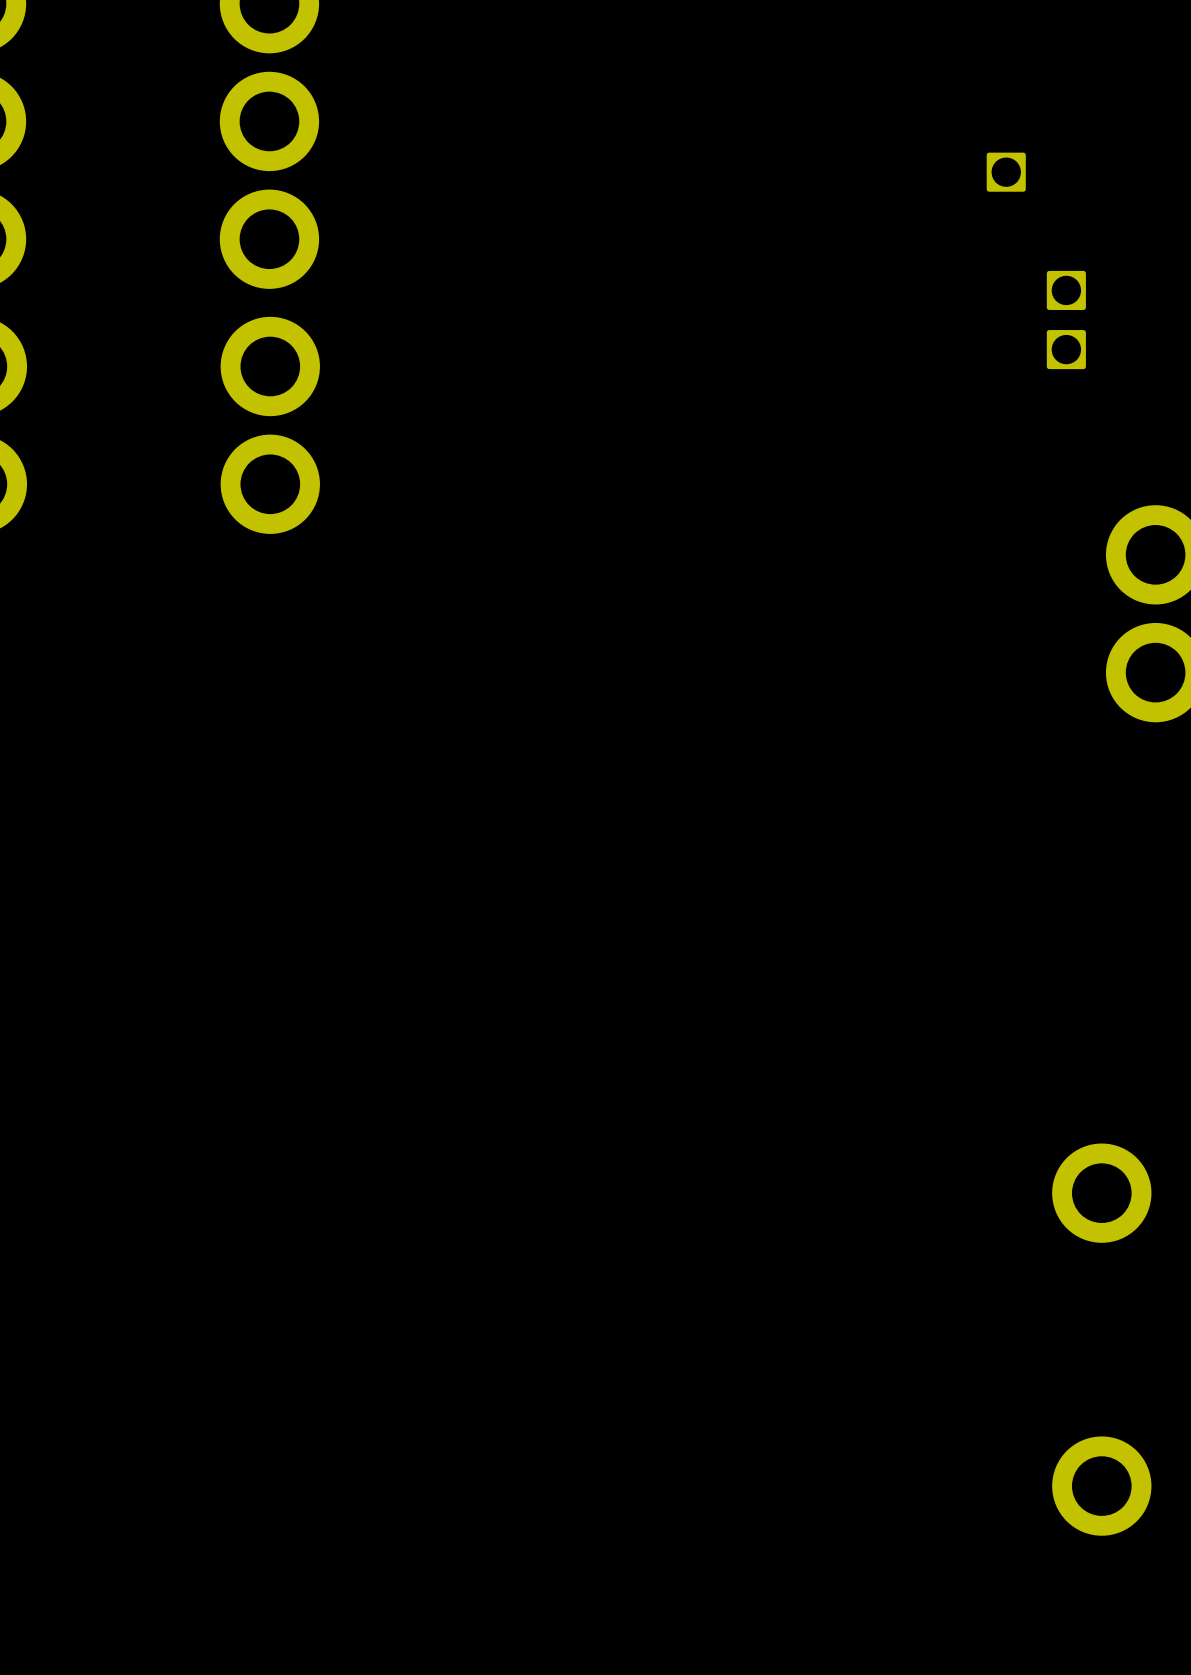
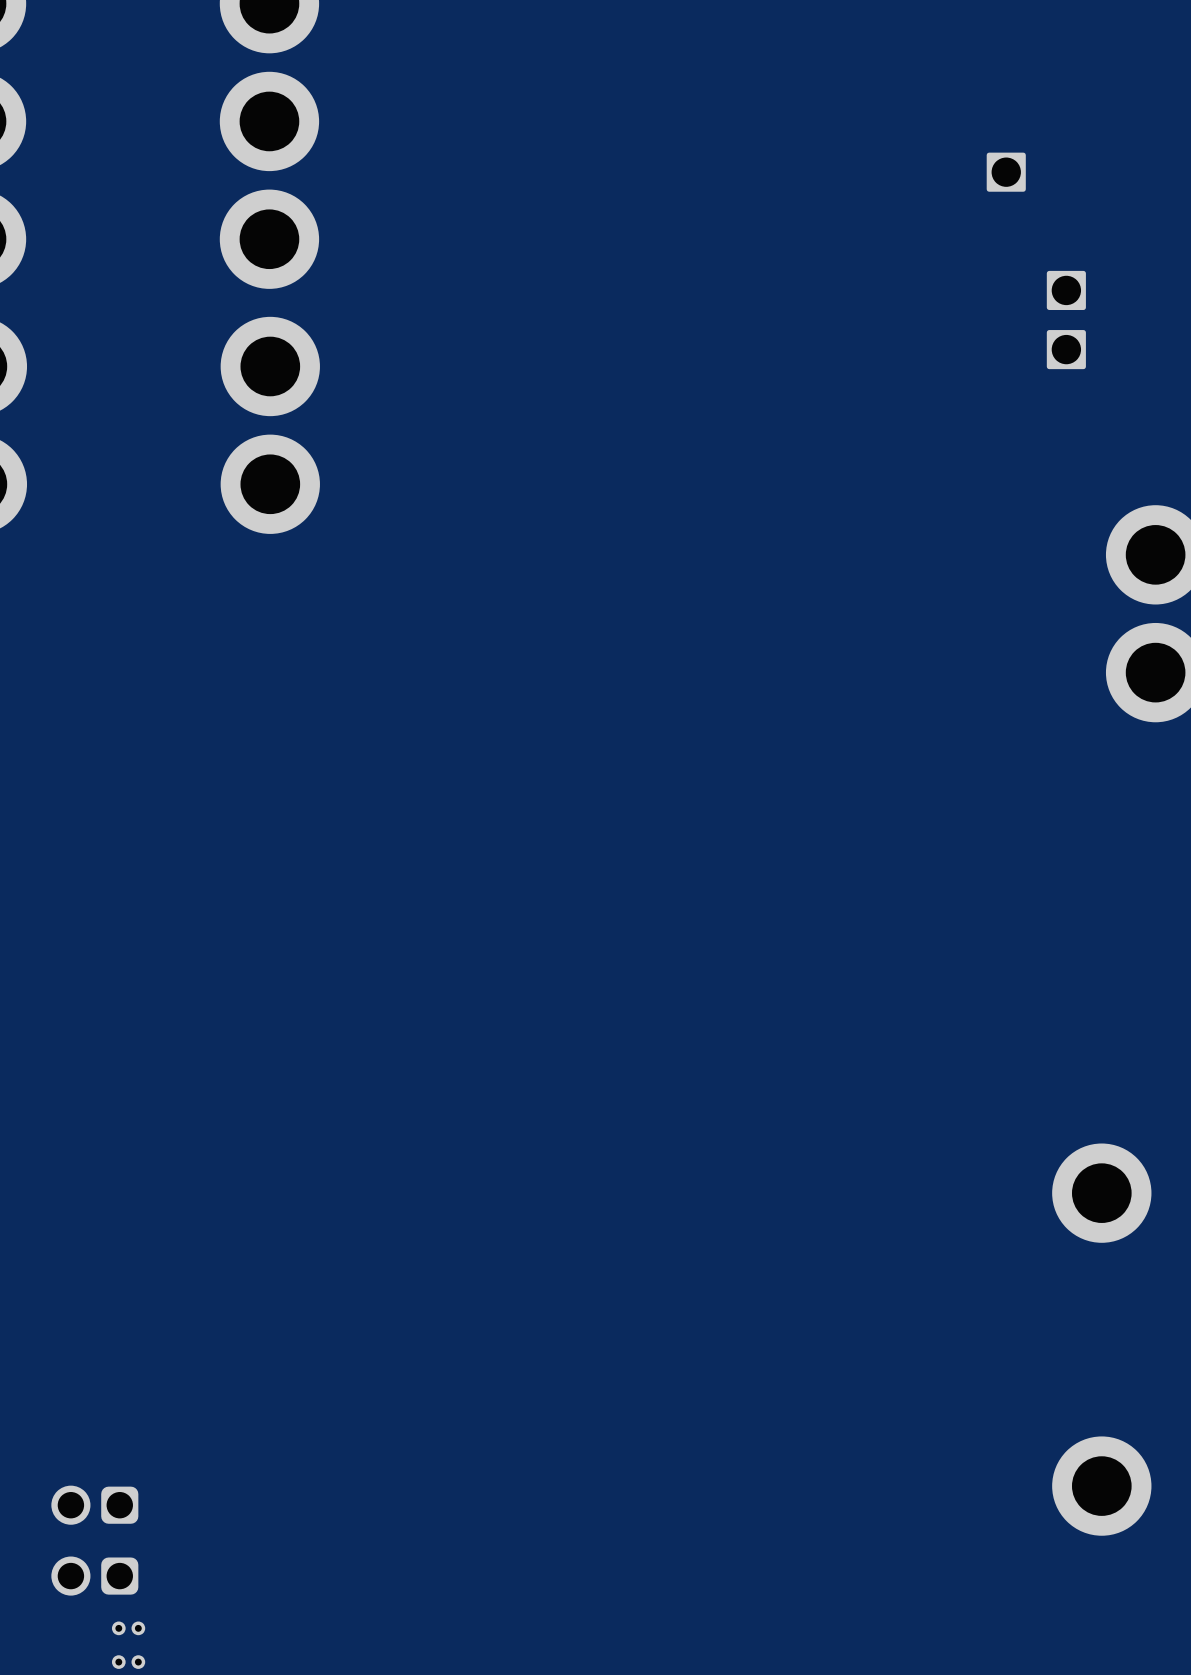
part: none -> (94, 1505)
part: none -> (94, 1576)
part: none -> (128, 1628)
part: none -> (128, 1662)

